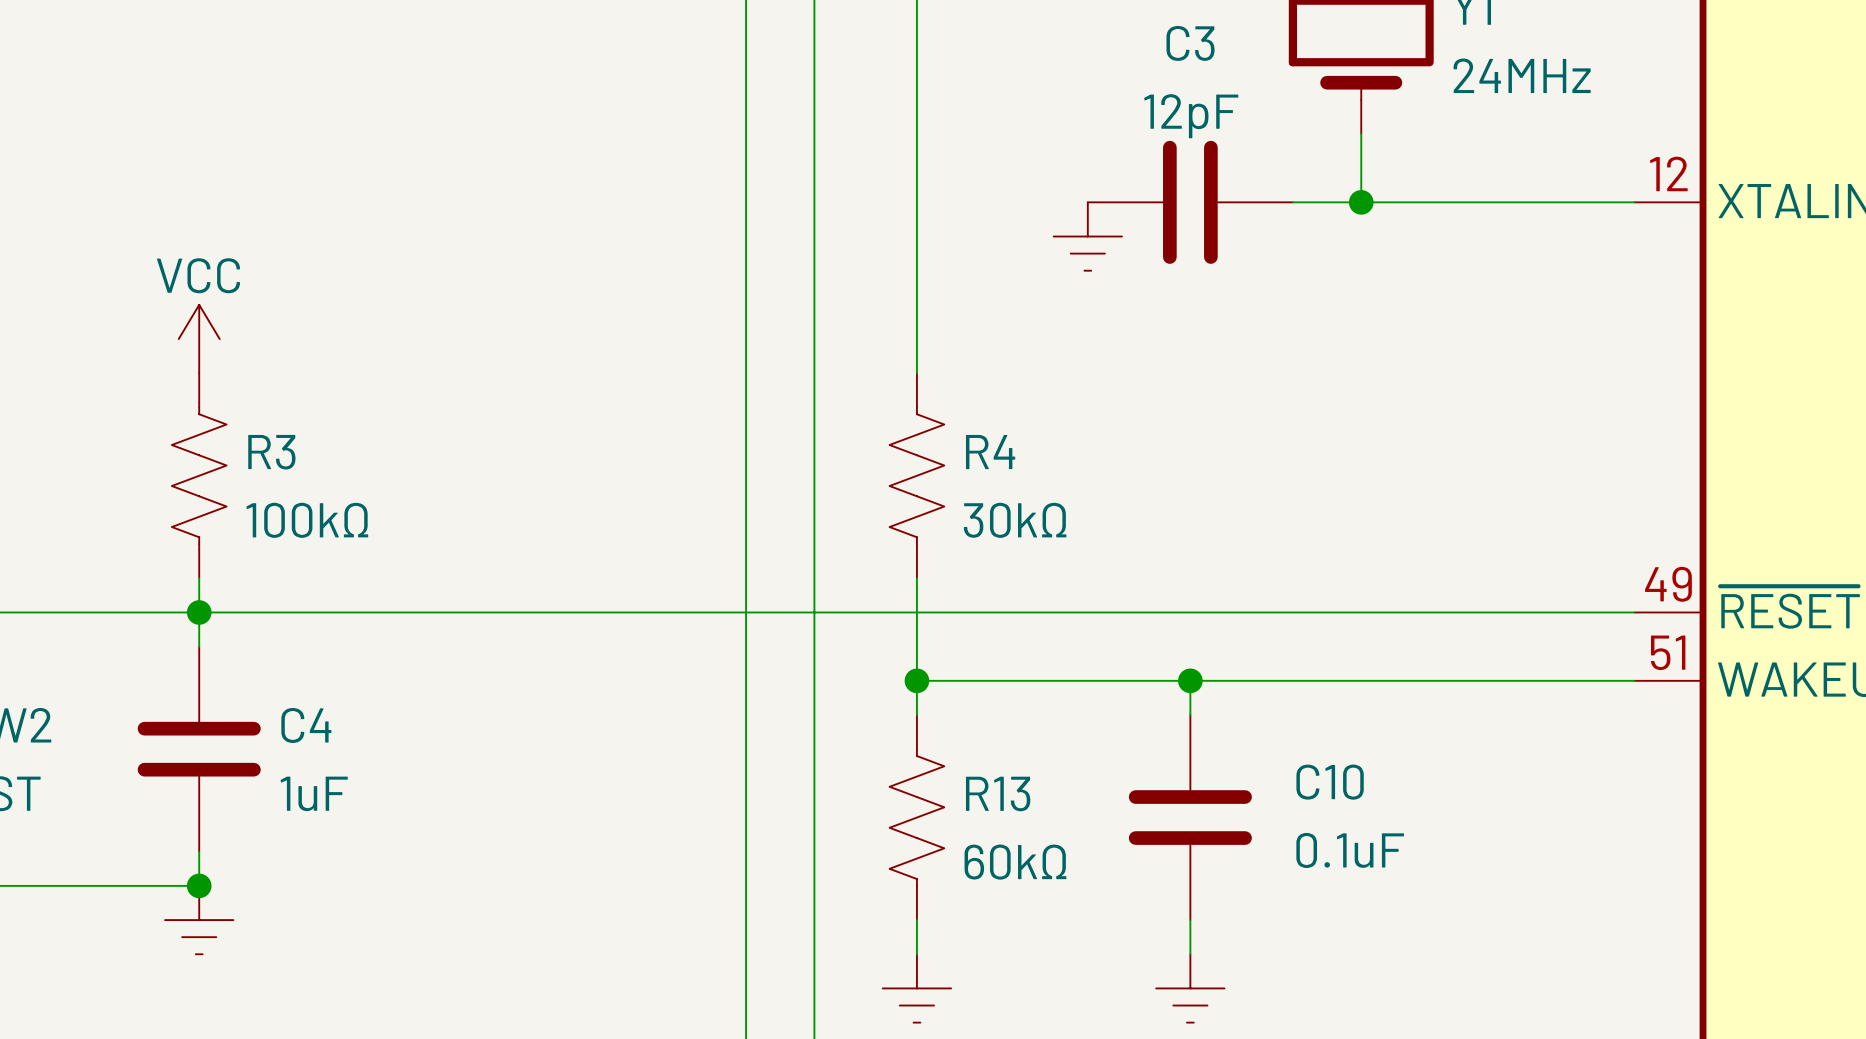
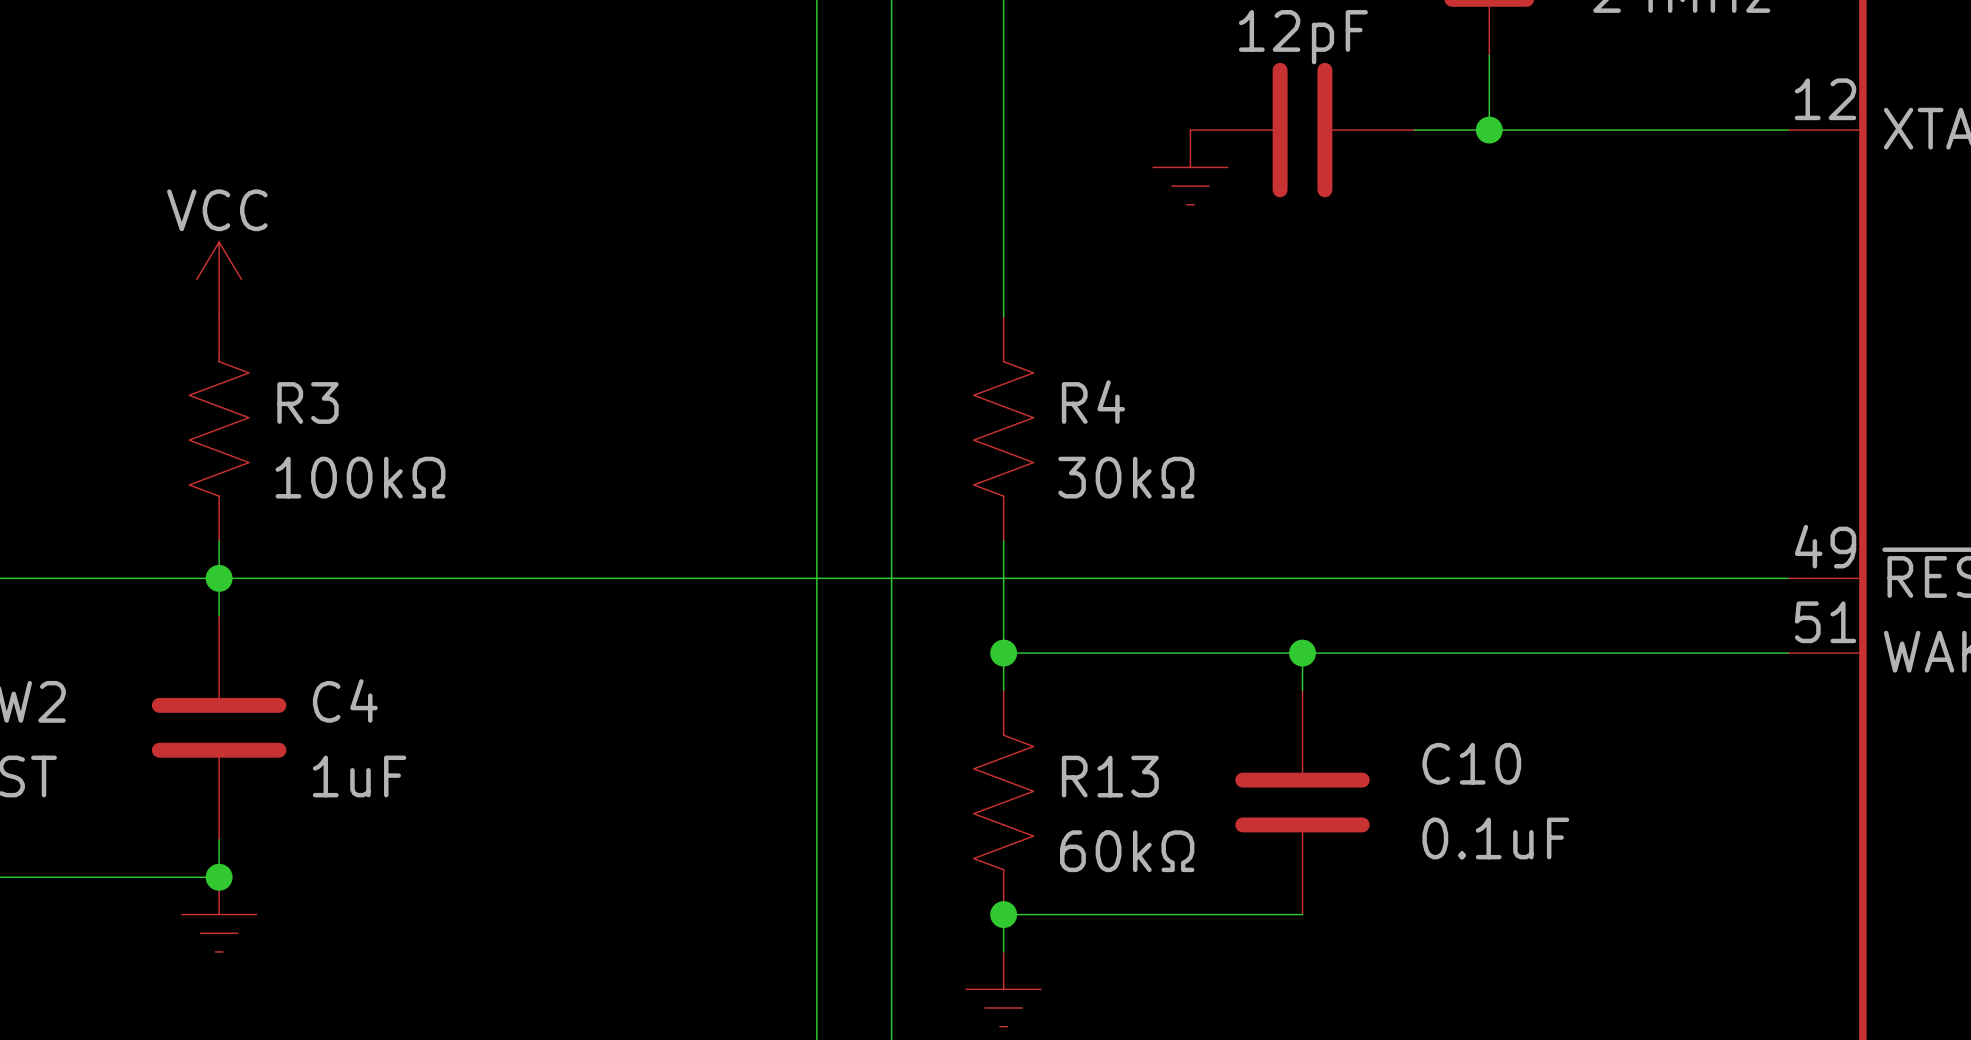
junction: none -> (1003, 914)
wire: (1190, 920) (1190, 954) -> (1302, 914) (1003, 914)
power symbol: (1190, 988) -> none

